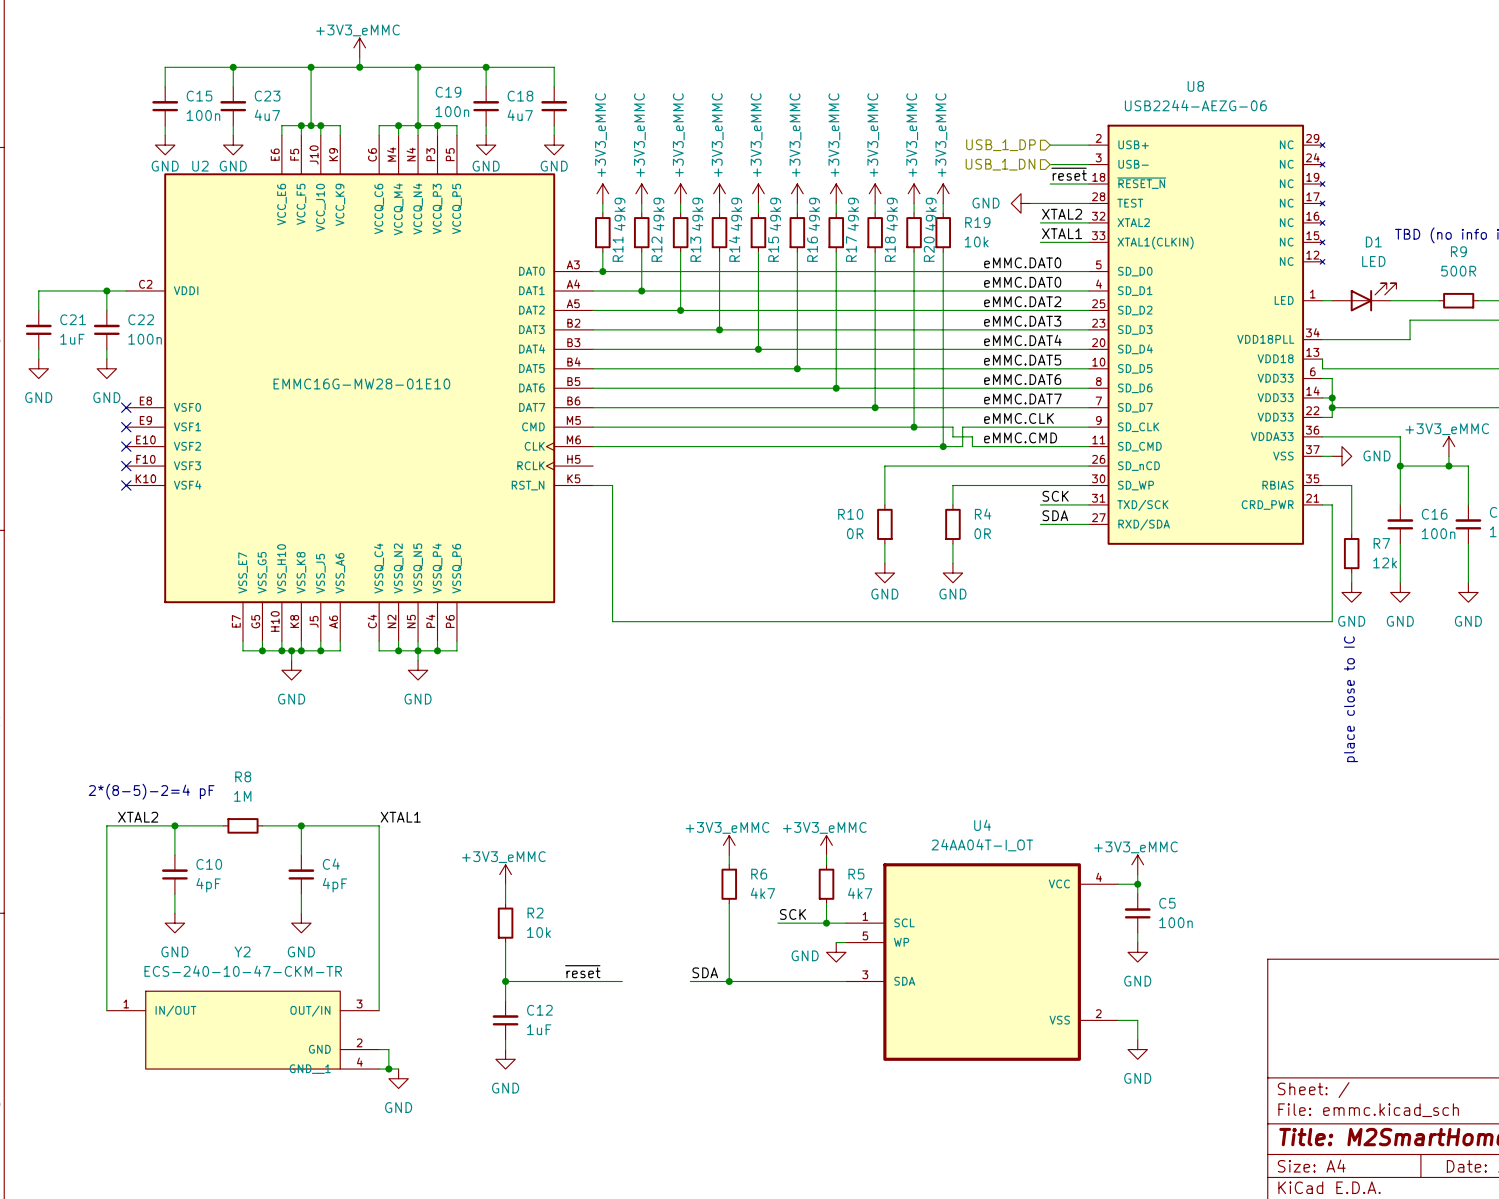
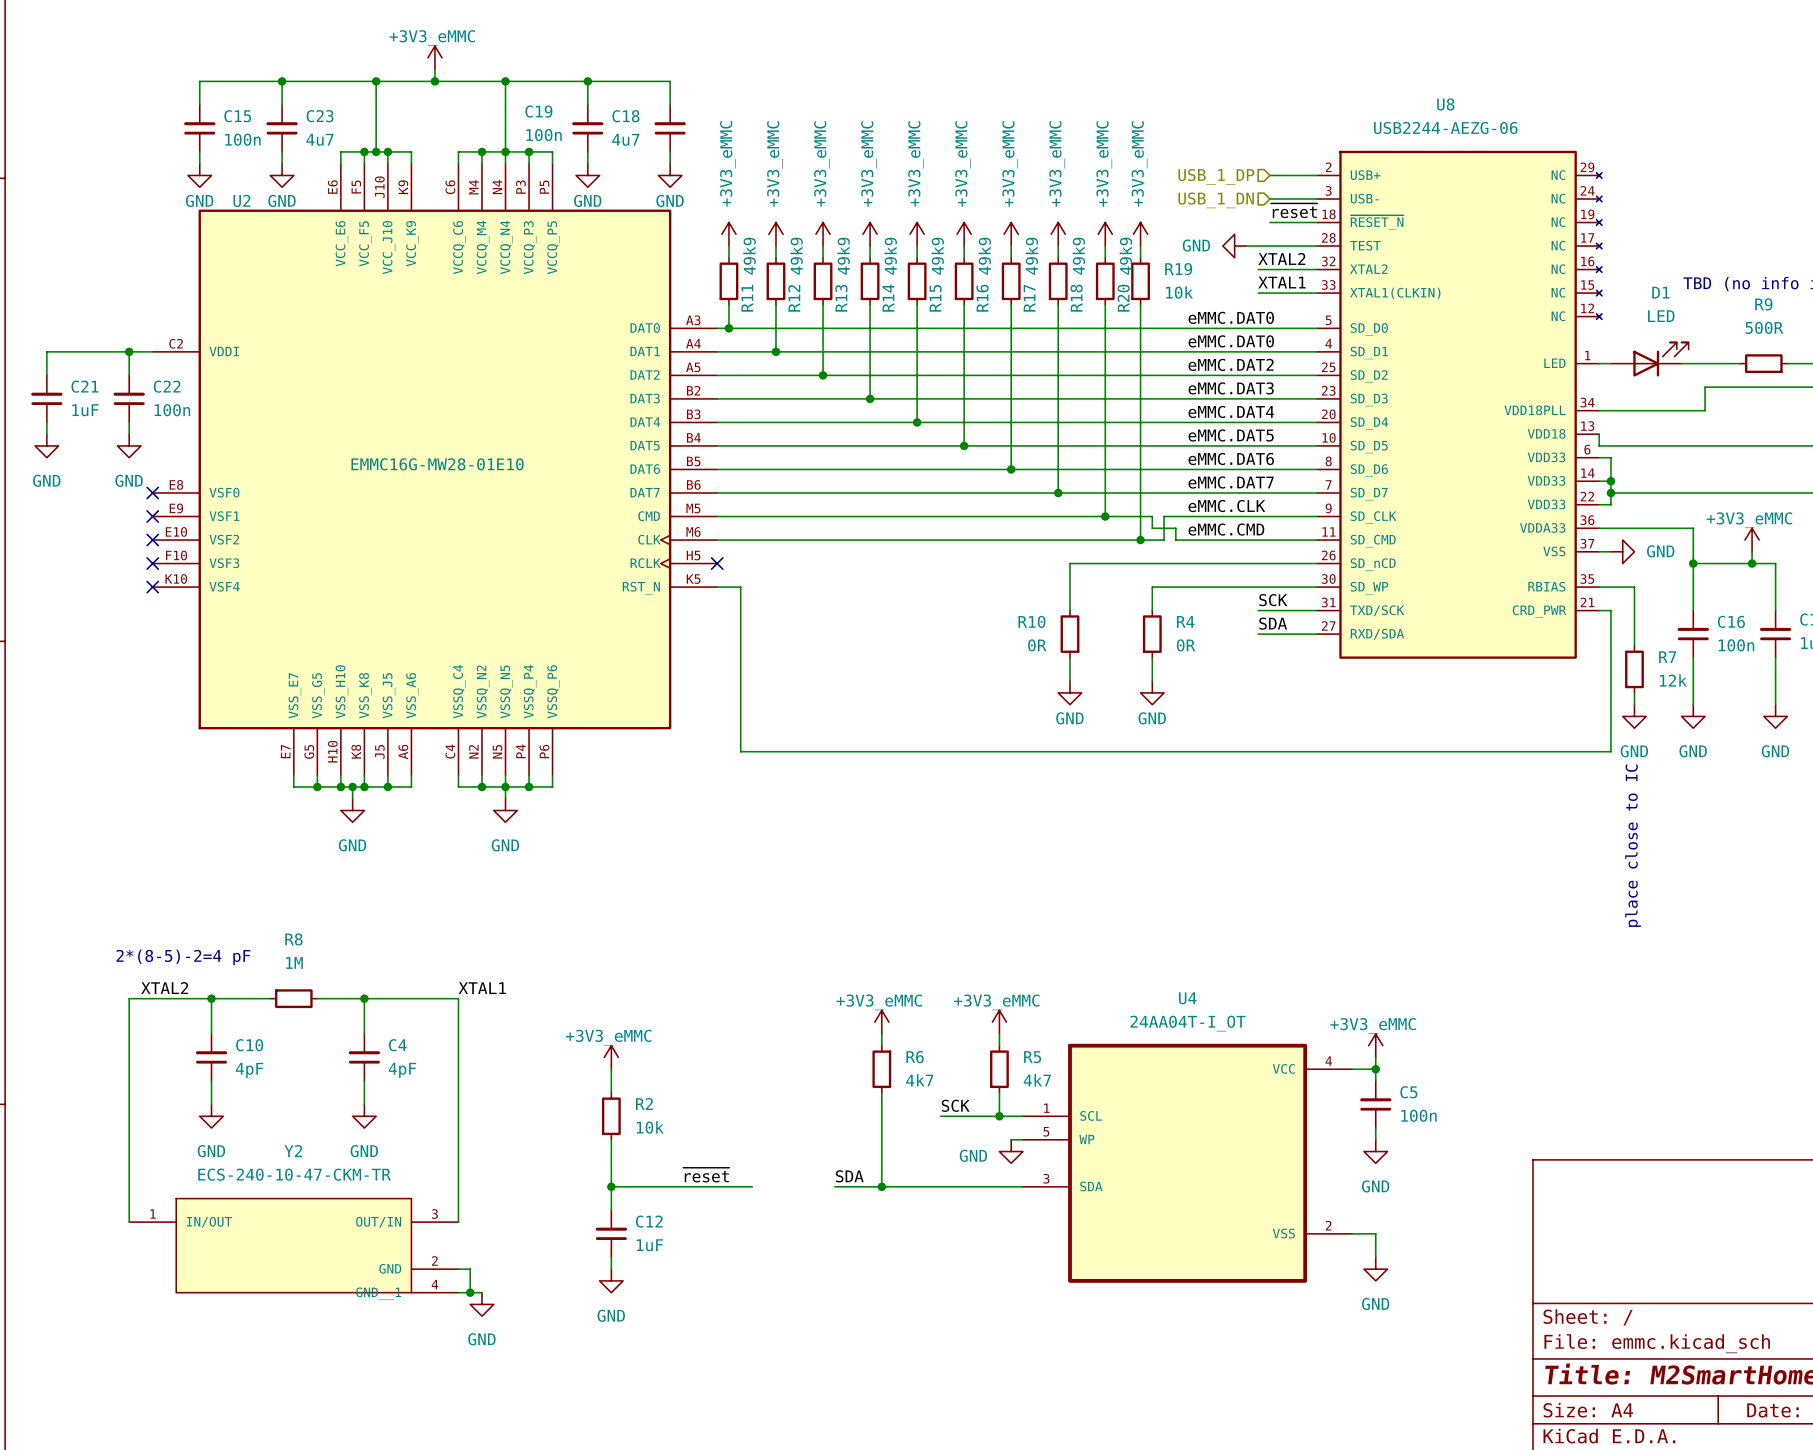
no-connect mark: none -> (717, 563)

